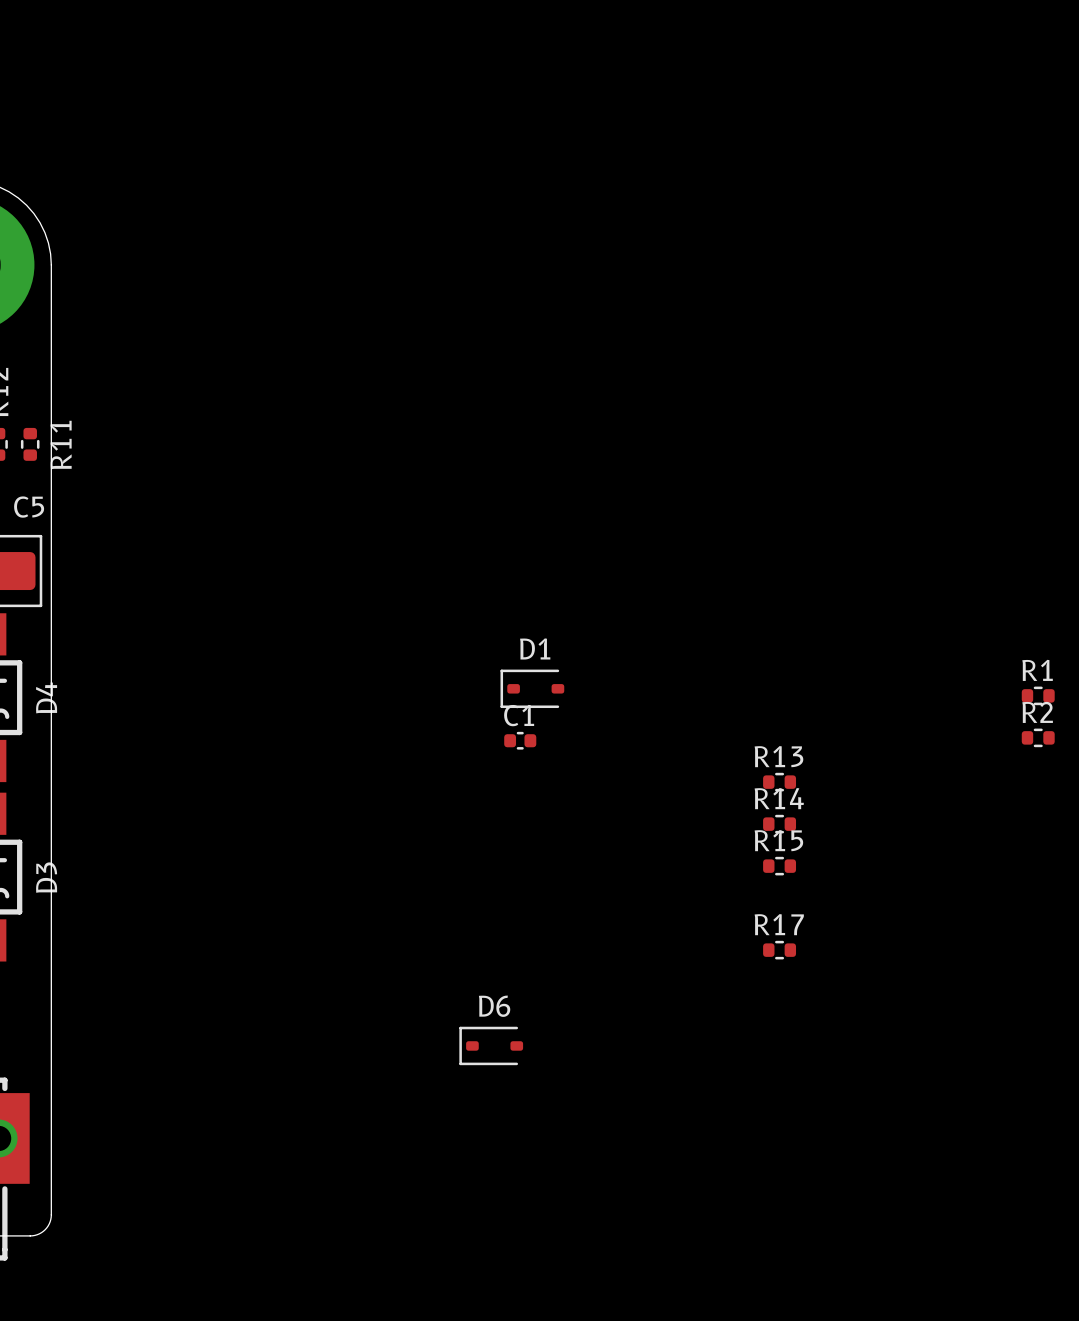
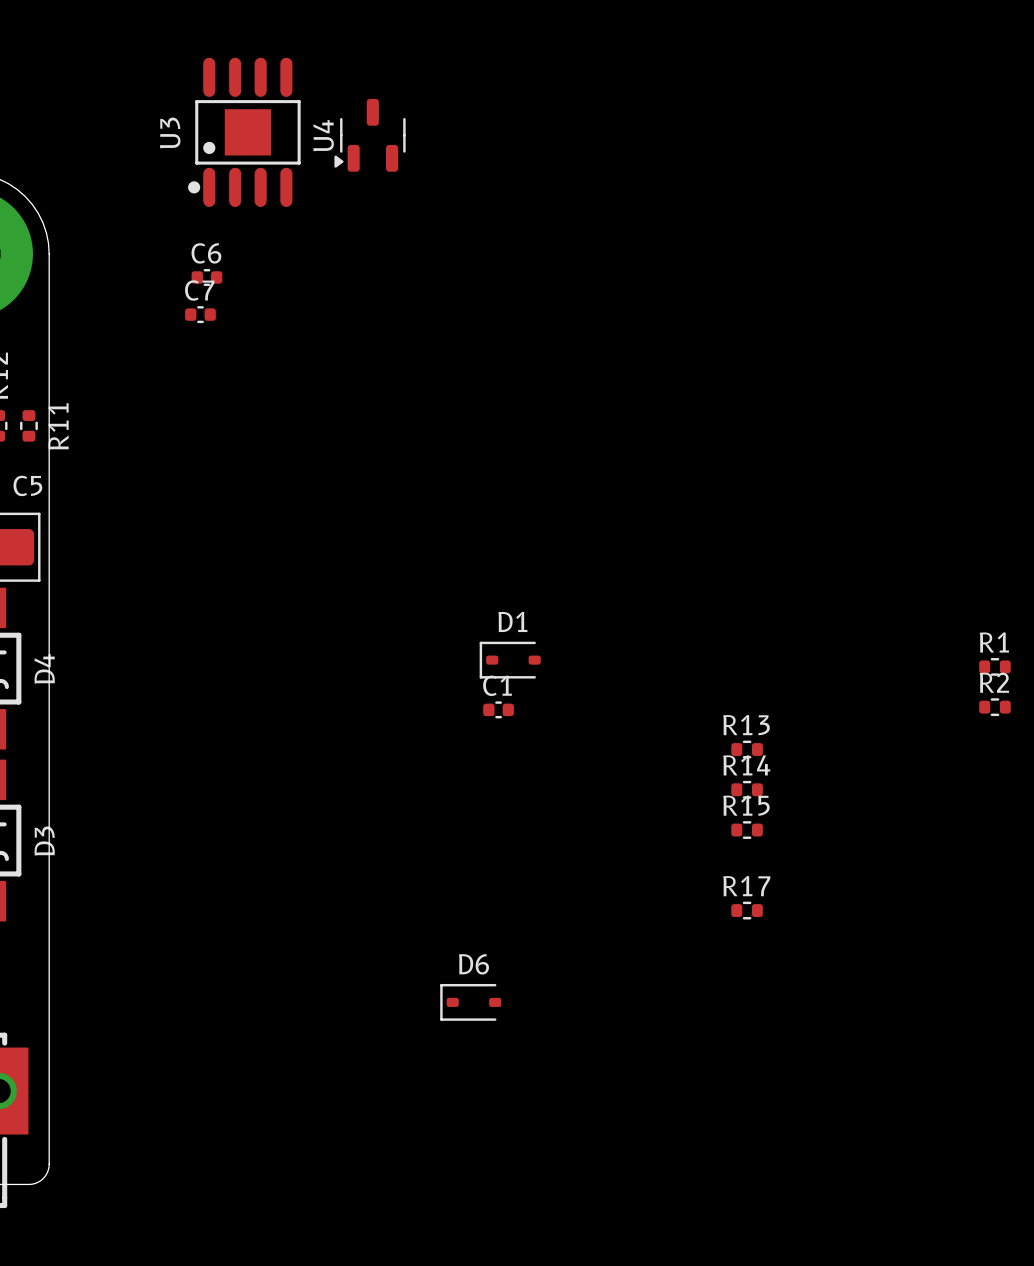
U3: none -> (244, 132)
U4: none -> (370, 135)
C6: none -> (206, 277)
C7: none -> (200, 314)

